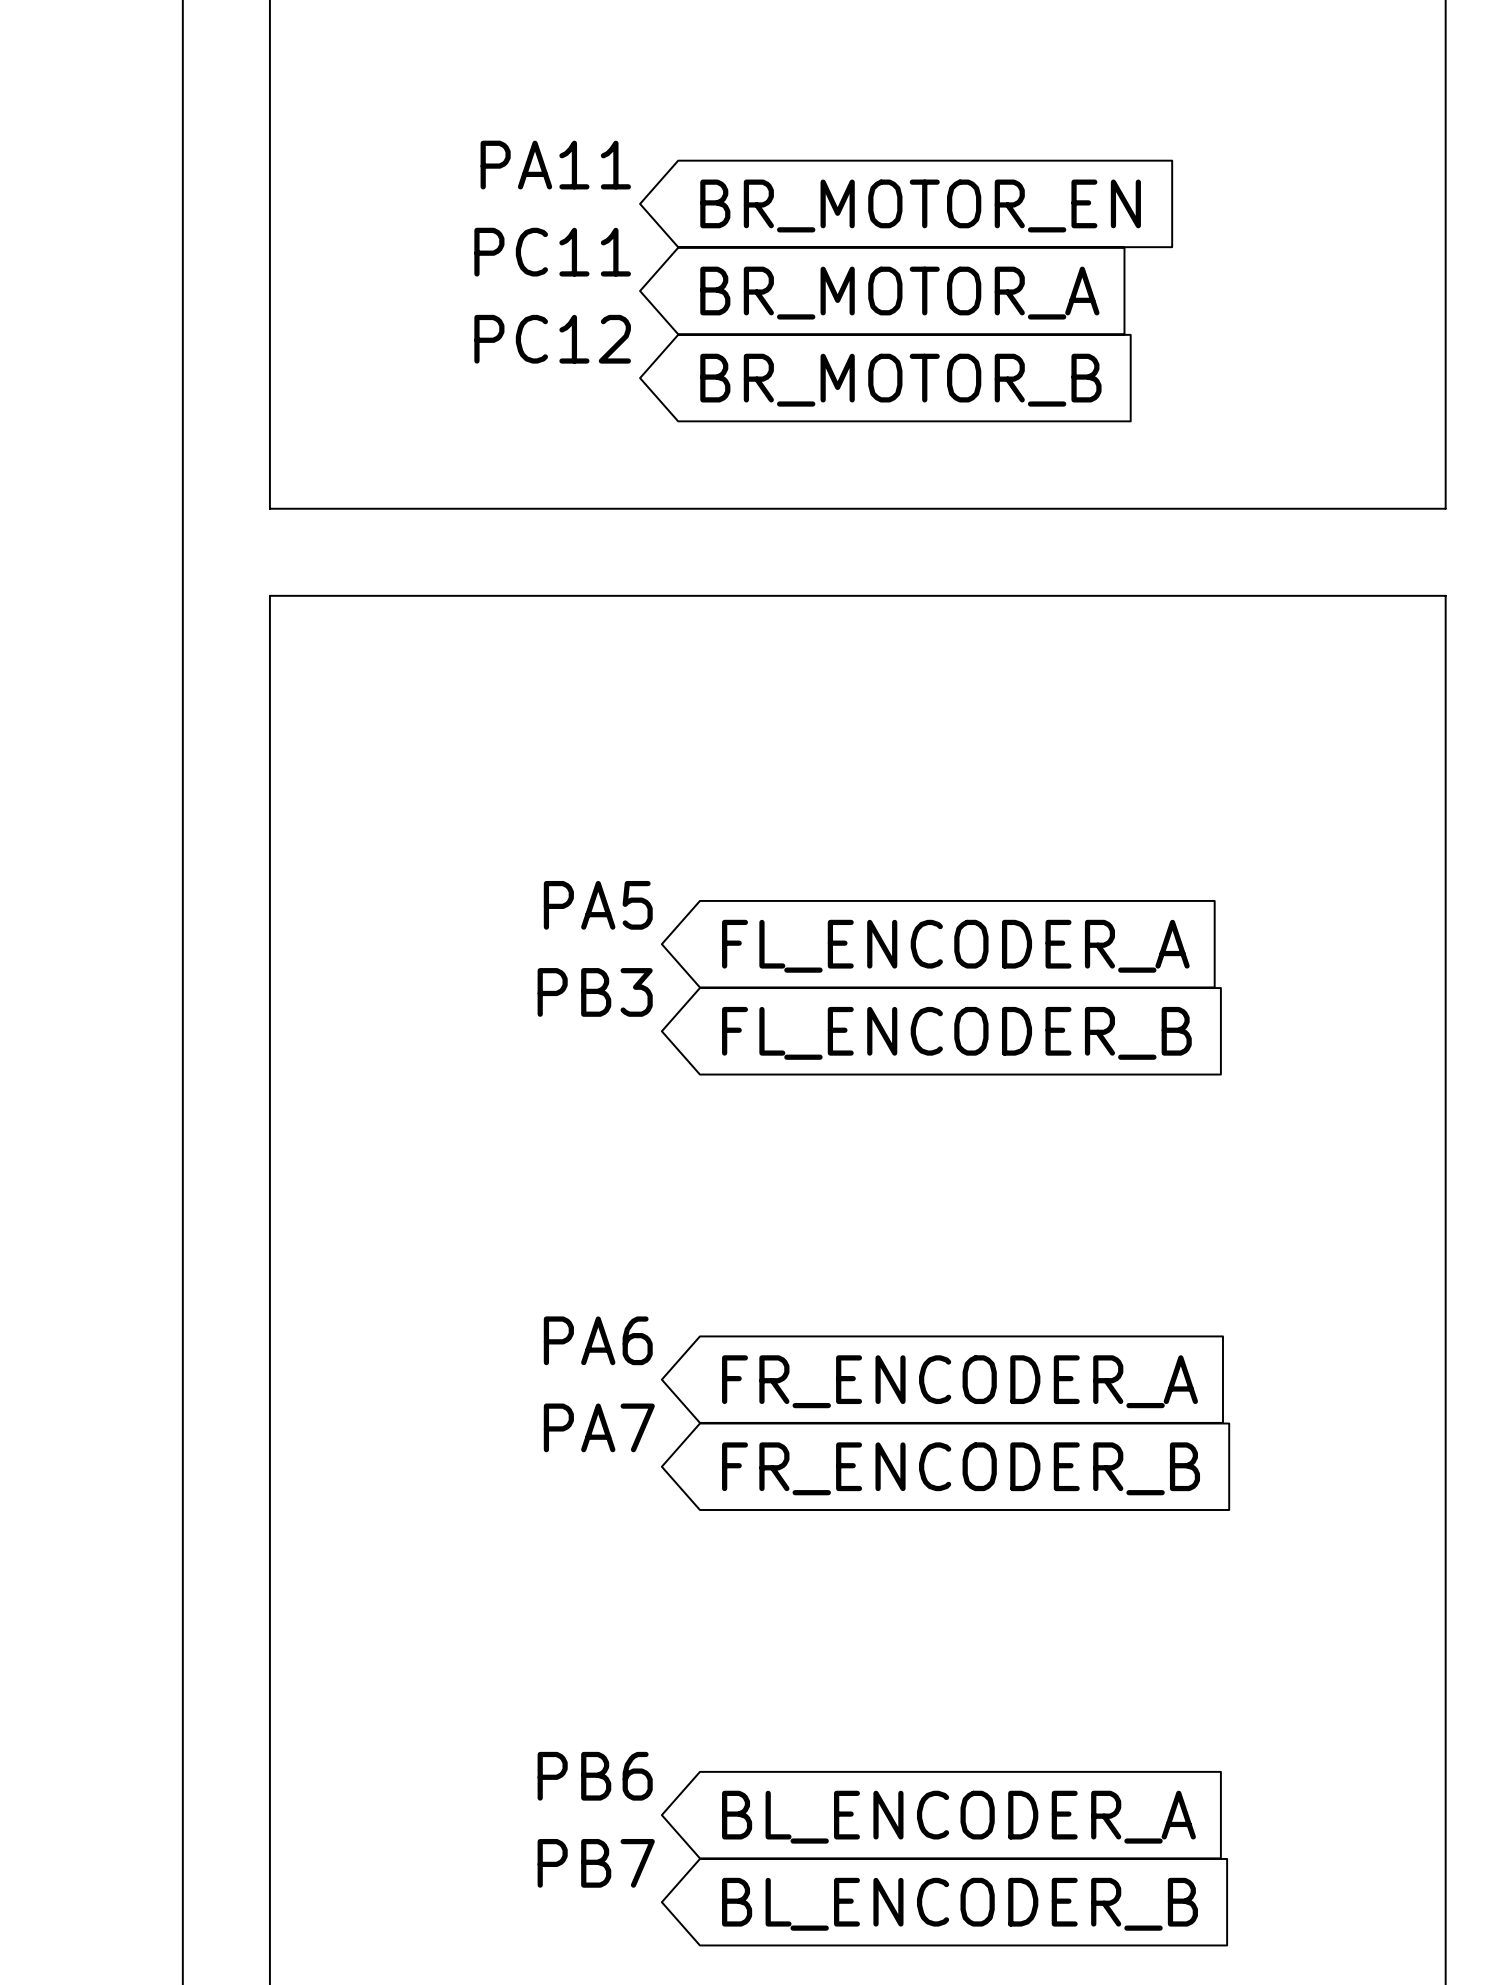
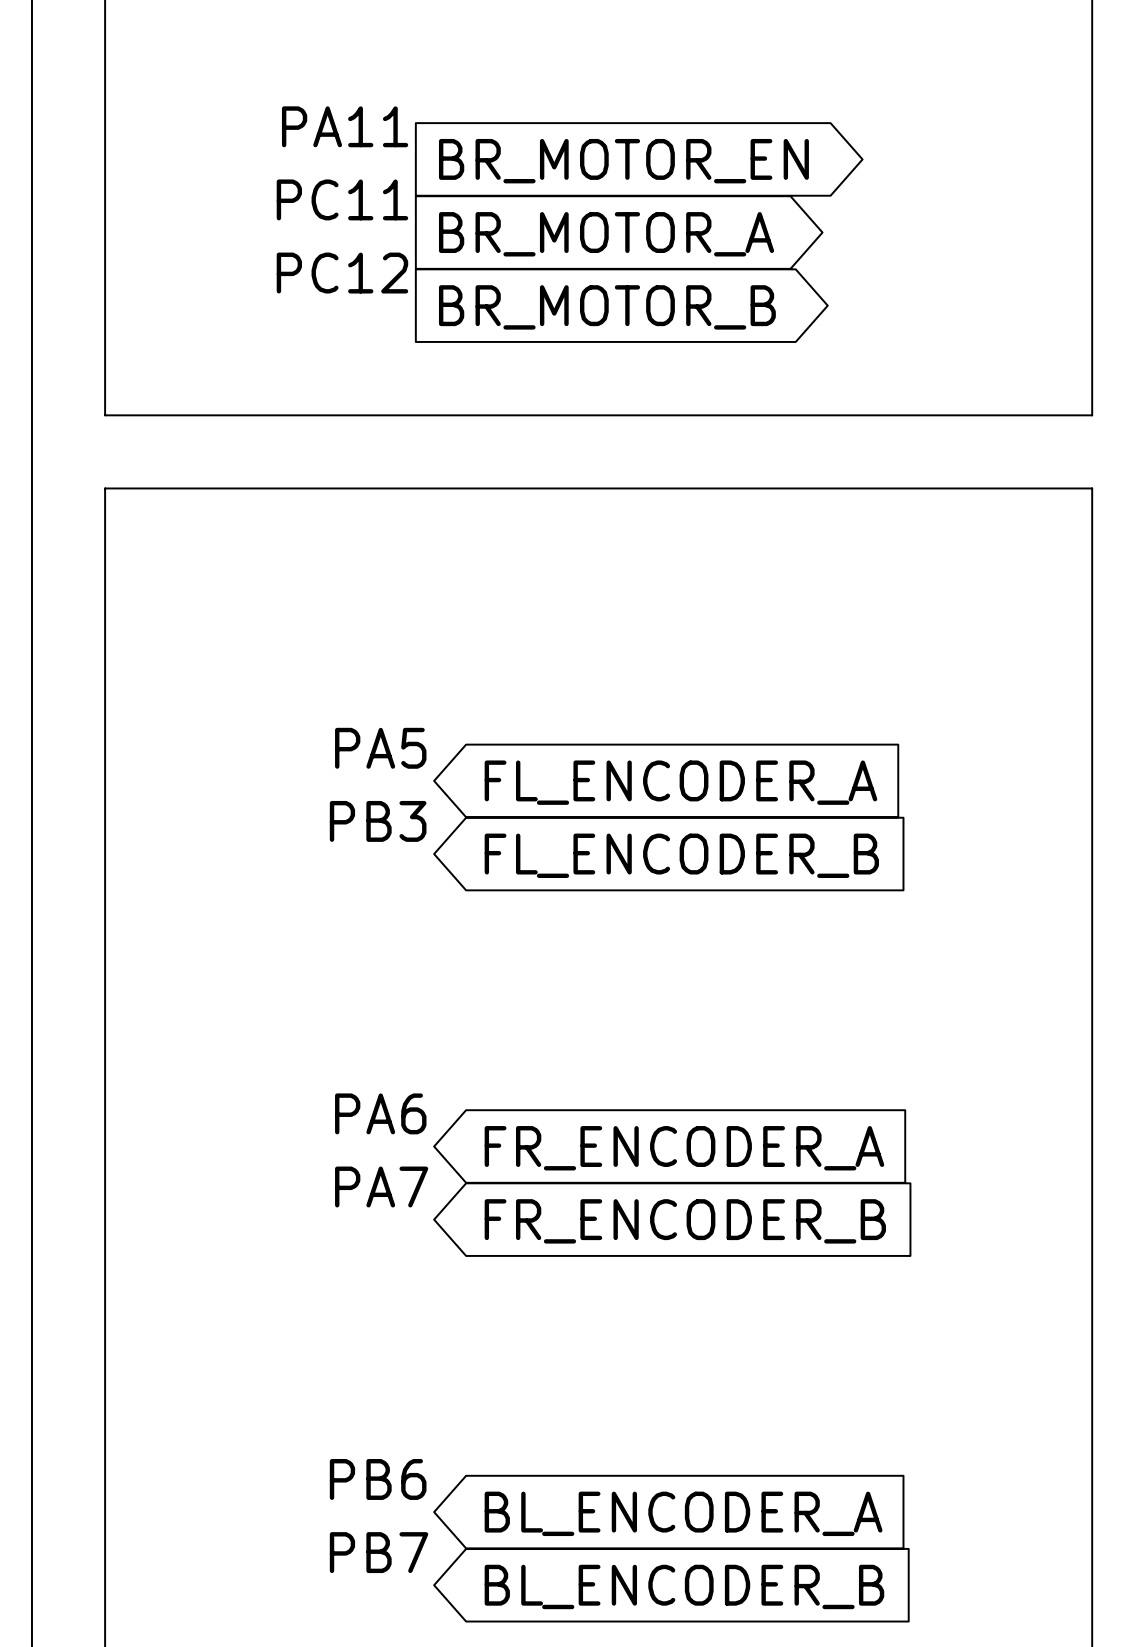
global label shape: input (920, 205) -> output (623, 161)
global label shape: input (899, 293) -> output (606, 234)
global label shape: input (900, 380) -> output (607, 307)

